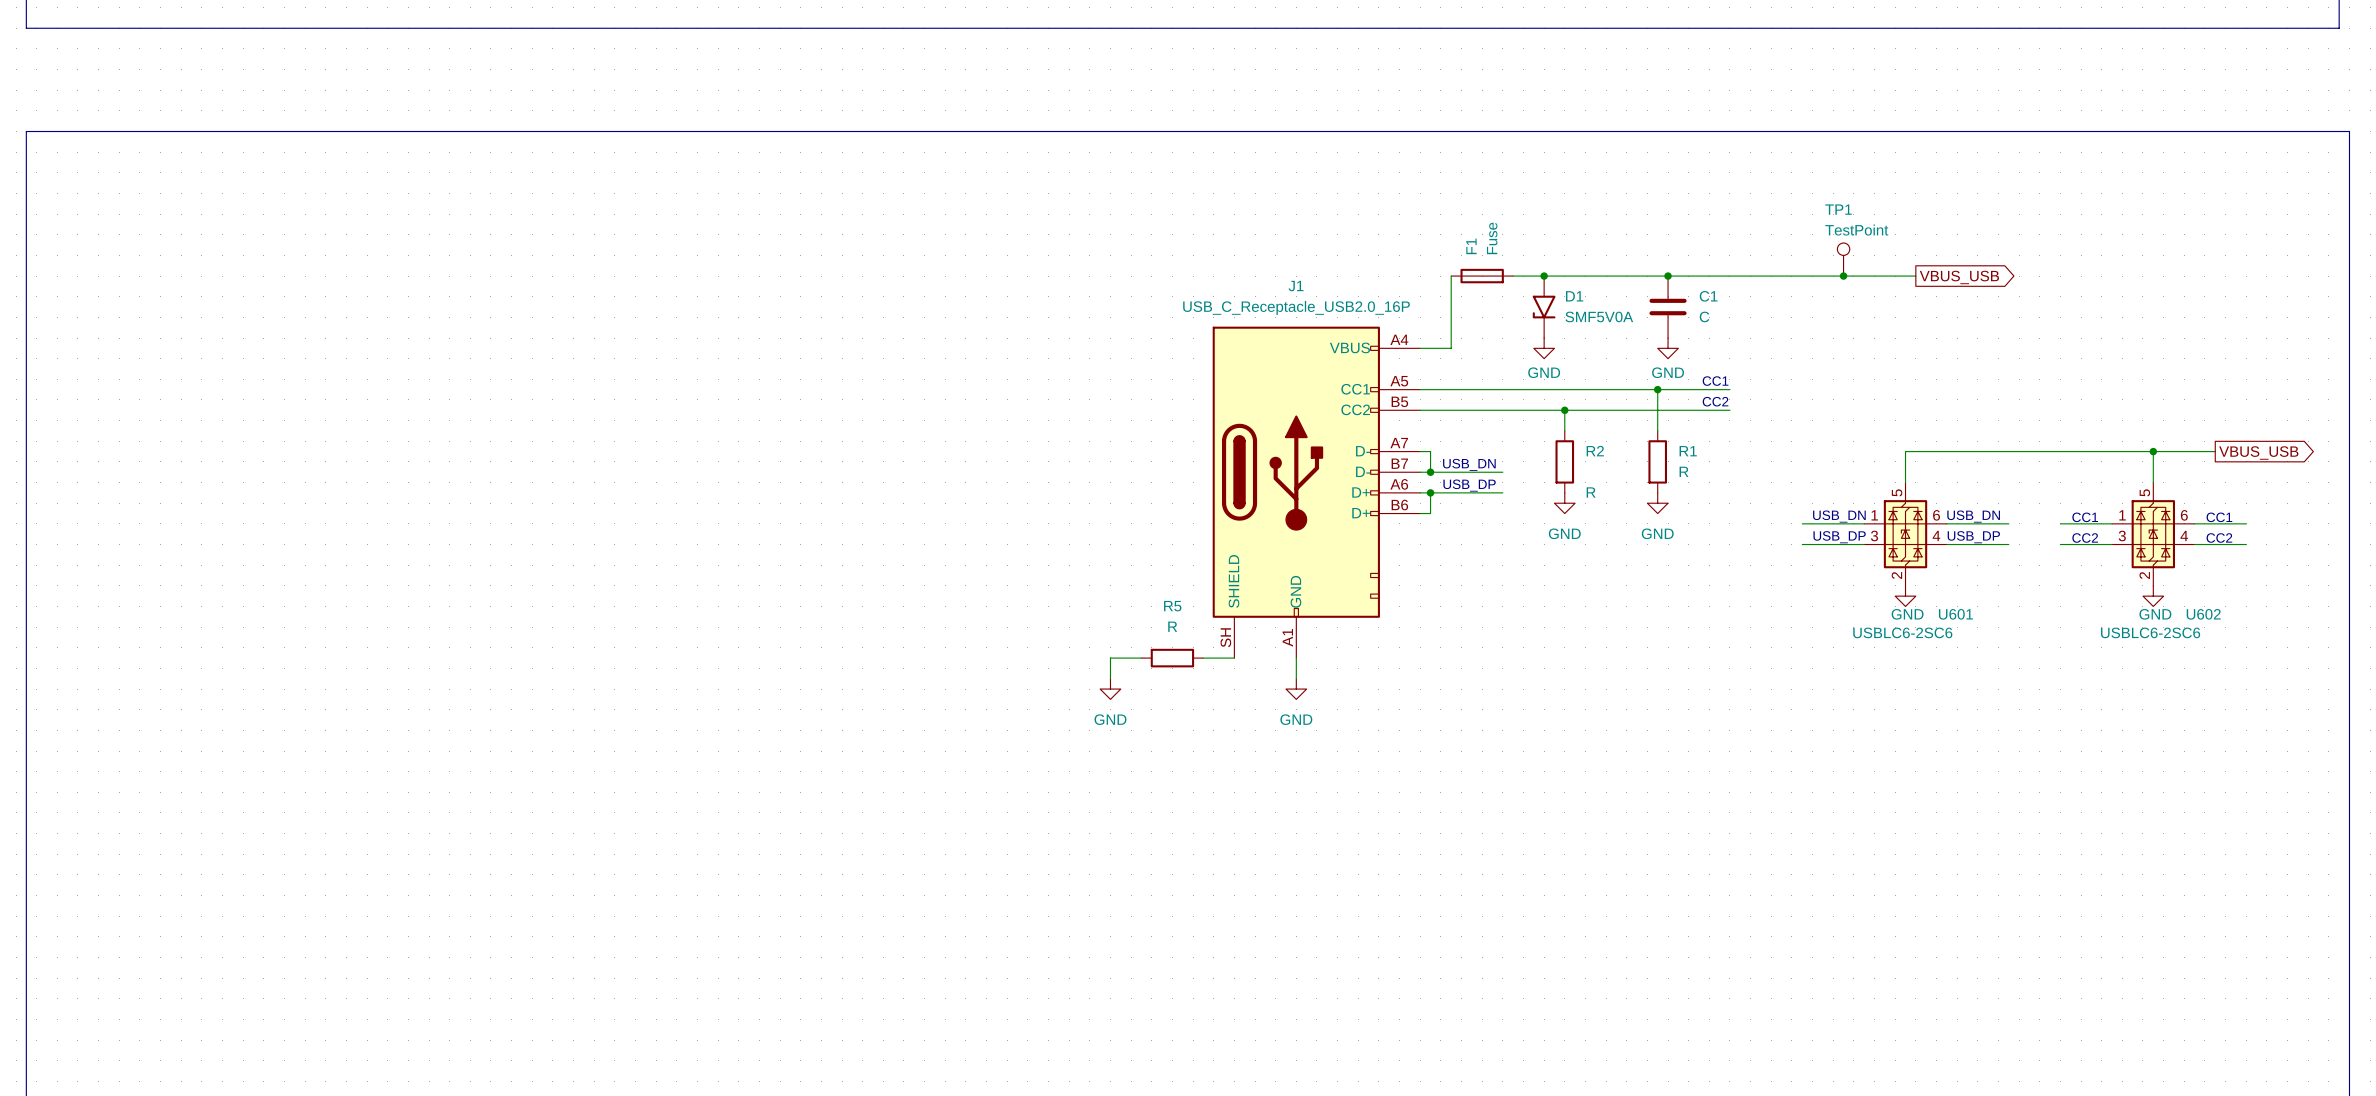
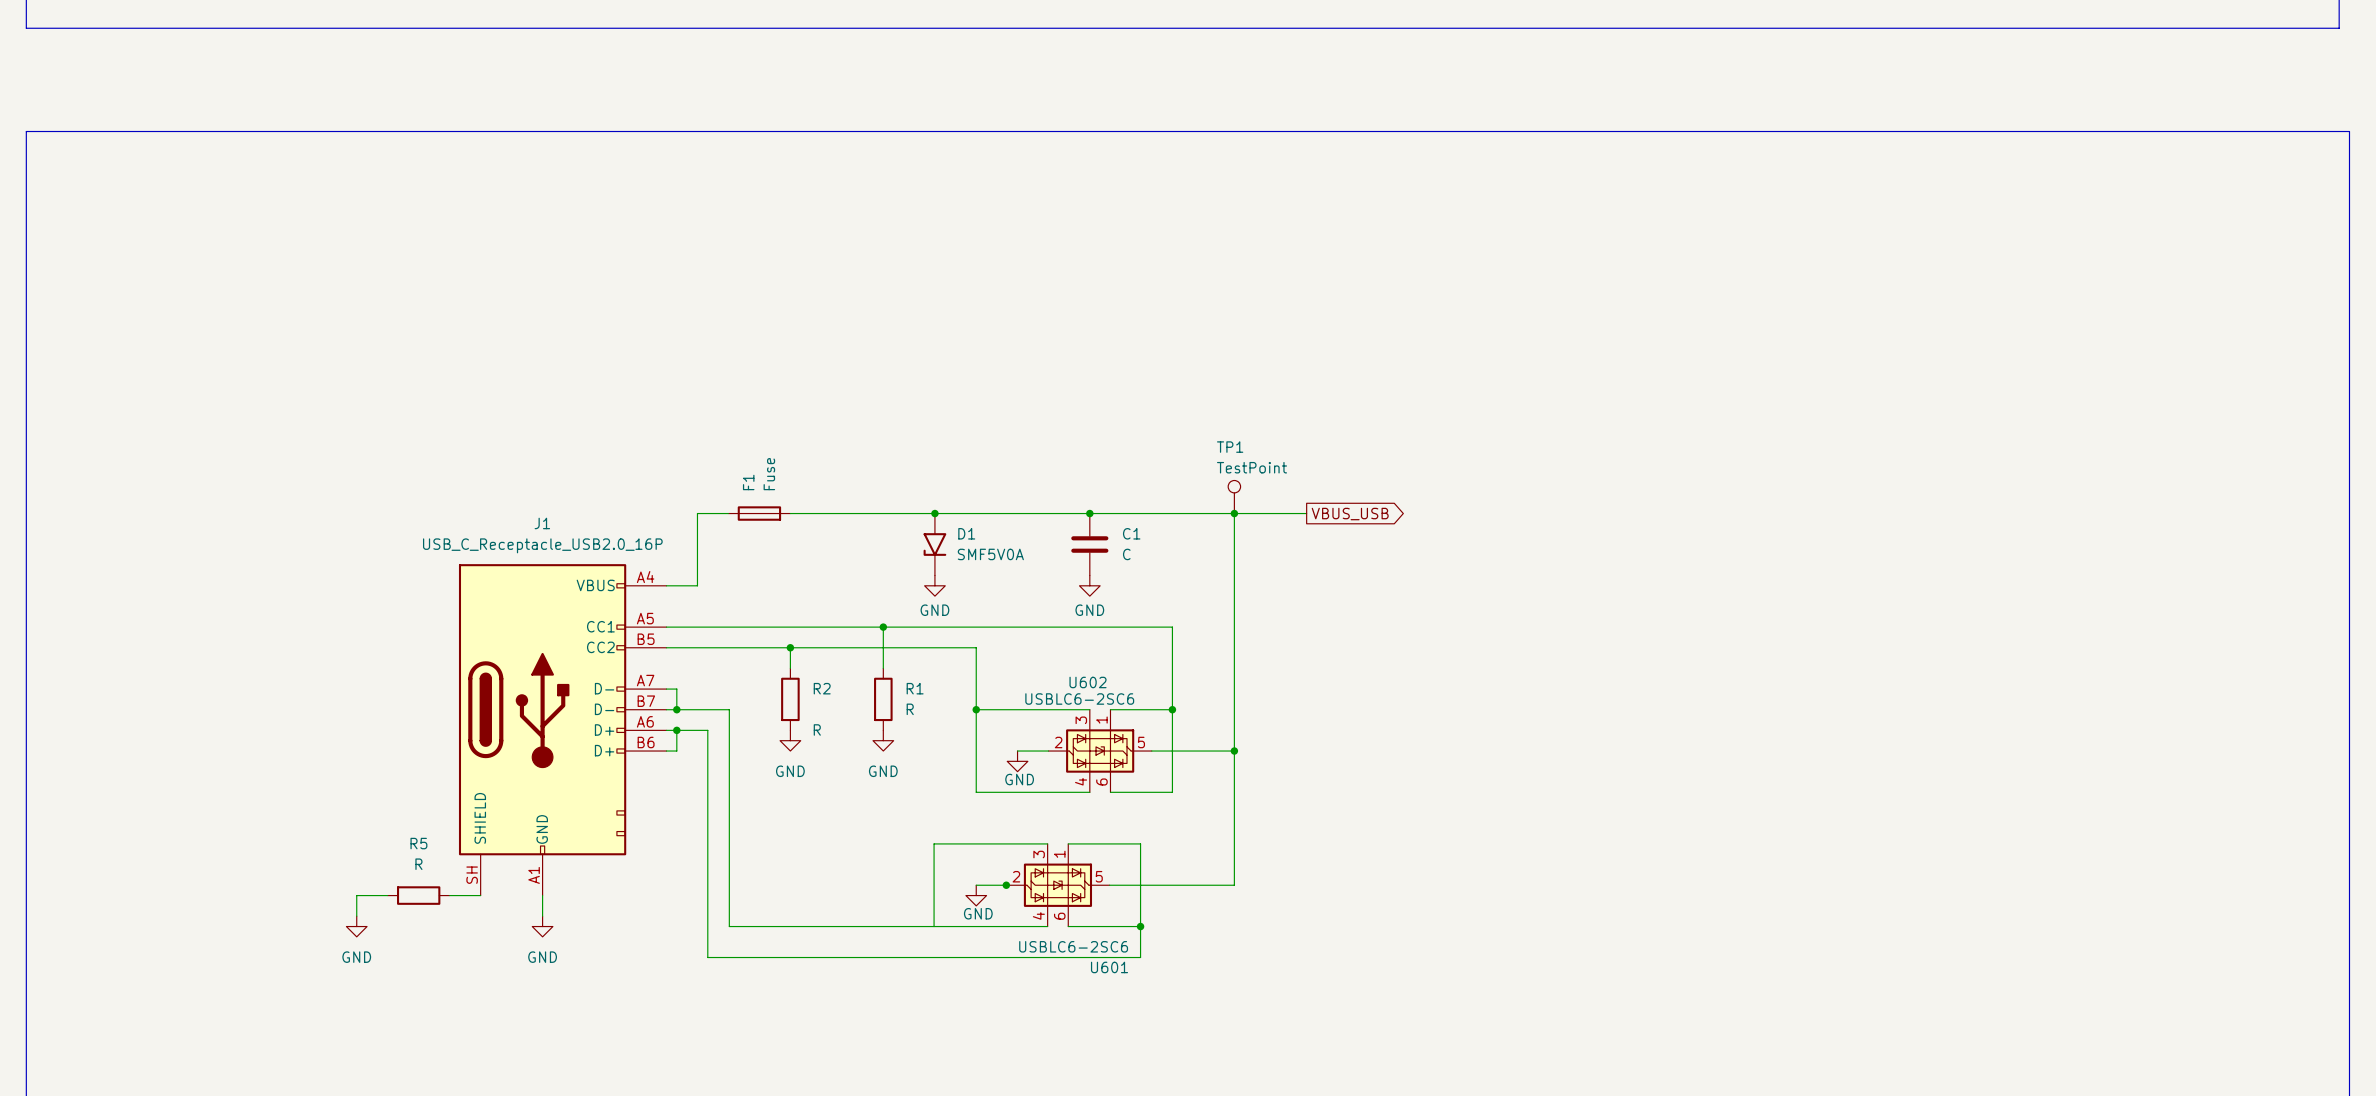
TP1 position: (1843, 259) -> (1234, 497)
wire: (1451, 276) (1451, 348) (1420, 348) -> none
F1 position: (1482, 276) -> (759, 513)
wire: (1513, 276) (1915, 276) -> none
junction: (1544, 276) -> none
junction: (1668, 276) -> none
junction: (1843, 276) -> none
global label: VBUS_USB (1959, 277) -> none
D1 position: (1544, 307) -> (934, 544)
C1 position: (1668, 307) -> (1089, 544)
power symbol: GND (1544, 348) -> none
power symbol: GND (1668, 348) -> none
text: CC1 (1715, 381) -> none
wire: (1420, 389) (1729, 389) -> none
wire: (1657, 389) (1657, 430) -> none
junction: (1657, 389) -> none
text: CC2 (1715, 401) -> none
wire: (1420, 410) (1729, 410) -> none
wire: (1564, 410) (1564, 430) -> none
junction: (1564, 410) -> none
wire: (1420, 451) (1430, 451) (1430, 472) -> none
wire: (2153, 451) (2153, 482) -> none
junction: (2153, 451) -> none
wire: (2215, 451) (1905, 451) (1905, 482) -> none
global label: VBUS_USB (2258, 453) -> none
R2 position: (1564, 461) -> (790, 699)
R1 position: (1657, 461) -> (883, 699)
text: USB_DN (1469, 464) -> none
wire: (1420, 472) (1502, 472) -> none
junction: (1430, 472) -> none
text: USB_DP (1469, 485) -> none
J1 position: (1316, 492) -> (562, 729)
wire: (1420, 492) (1502, 492) -> none
wire: (1430, 492) (1430, 513) (1420, 513) -> none
junction: (1430, 492) -> none
power symbol: GND (1564, 503) -> none
power symbol: GND (1657, 503) -> none
wire: none -> (728, 513) (697, 513) (697, 585) (666, 585)
wire: none -> (790, 513) (1306, 513)
junction: none -> (934, 513)
junction: none -> (1089, 513)
wire: none -> (1234, 513) (1234, 885) (1109, 885)
junction: none -> (1234, 513)
global label: none -> VBUS_USB (1350, 514)
text: USB_DN (1839, 516) -> none
text: USB_DN (1973, 516) -> none
text: CC1 (2085, 517) -> none
text: CC1 (2219, 517) -> none
wire: (1802, 523) (1864, 523) -> none
wire: (1946, 523) (2008, 523) -> none
wire: (2060, 523) (2112, 523) -> none
wire: (2194, 523) (2246, 523) -> none
U601 rotation: 0° (1905, 534) -> 90° clockwise (1057, 885)
U601 position: (1905, 534) -> (1057, 885)
U602 rotation: 0° (2153, 534) -> 90° clockwise (1100, 751)
U602 position: (2153, 534) -> (1100, 751)
text: USB_DP (1839, 537) -> none
text: USB_DP (1973, 537) -> none
text: CC2 (2085, 538) -> none
text: CC2 (2219, 538) -> none
wire: (1802, 544) (1864, 544) -> none
wire: (1946, 544) (2008, 544) -> none
wire: (2060, 544) (2112, 544) -> none
wire: (2194, 544) (2246, 544) -> none
power symbol: none -> GND (934, 585)
power symbol: none -> GND (1089, 585)
power symbol: GND (1905, 596) -> none
power symbol: GND (2153, 596) -> none
U602 name position: U602 (2203, 614) -> U602 (1088, 682)
wire: none -> (666, 627) (1172, 627) (1172, 792) (1110, 792)
wire: none -> (883, 627) (883, 668)
junction: none -> (883, 627)
U601 value position: USBLC6-2SC6 (1902, 632) -> USBLC6-2SC6 (1073, 946)
U602 value position: USBLC6-2SC6 (2150, 632) -> USBLC6-2SC6 (1079, 699)
wire: none -> (666, 647) (976, 647) (976, 792) (1089, 792)
wire: none -> (790, 647) (790, 668)
junction: none -> (790, 647)
wire: (1141, 658) (1110, 658) (1110, 678) -> none
R5 position: (1172, 658) -> (418, 895)
wire: (1203, 658) (1234, 658) -> none
wire: (1296, 658) (1296, 678) -> none
wire: none -> (666, 689) (676, 689) (676, 709)
power symbol: GND (1110, 689) -> none
power symbol: GND (1296, 689) -> none
wire: none -> (666, 709) (729, 709) (729, 926) (1047, 926)
junction: none -> (676, 709)
wire: none -> (976, 709) (1089, 709)
junction: none -> (976, 709)
wire: none -> (1110, 709) (1172, 709)
junction: none -> (1172, 709)
wire: none -> (666, 730) (707, 730) (707, 957) (1140, 957) (1140, 843) (1068, 843)
wire: none -> (676, 730) (676, 751) (666, 751)
junction: none -> (676, 730)
power symbol: none -> GND (790, 740)
power symbol: none -> GND (883, 740)
wire: none -> (1017, 751) (1048, 751)
wire: none -> (1151, 751) (1234, 751)
junction: none -> (1234, 751)
power symbol: none -> GND (1017, 761)
wire: none -> (1047, 843) (934, 843) (934, 926)
wire: none -> (976, 885) (1007, 885)
junction: none -> (1006, 885)
wire: none -> (387, 895) (356, 895) (356, 916)
wire: none -> (449, 895) (480, 895)
wire: none -> (542, 895) (542, 916)
power symbol: none -> GND (976, 895)
power symbol: none -> GND (356, 926)
power symbol: none -> GND (542, 926)
wire: none -> (1068, 926) (1140, 926)
junction: none -> (1140, 926)

